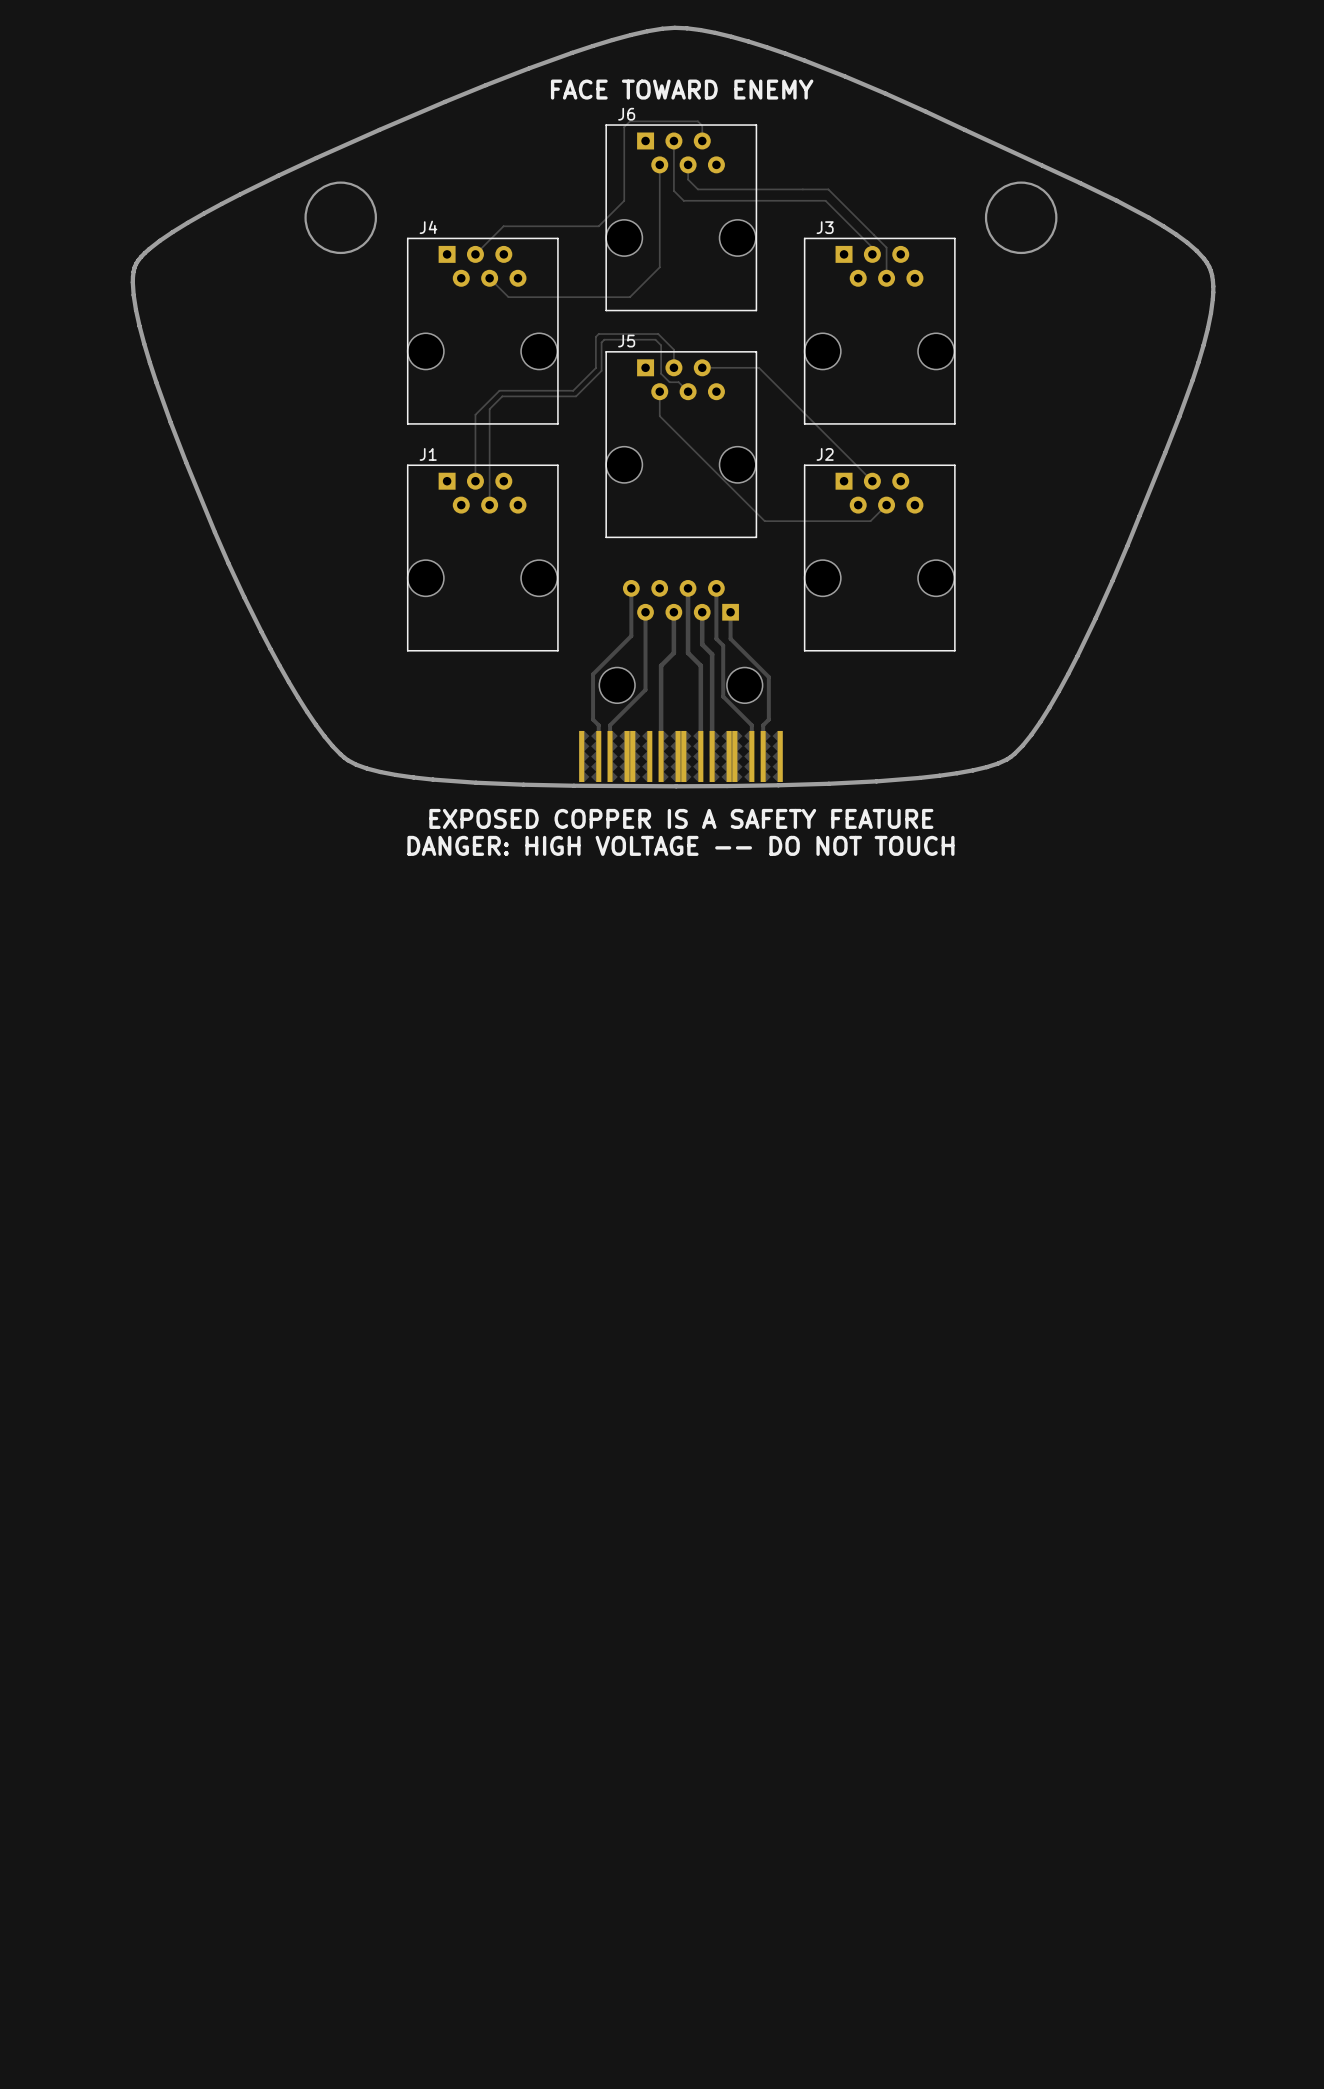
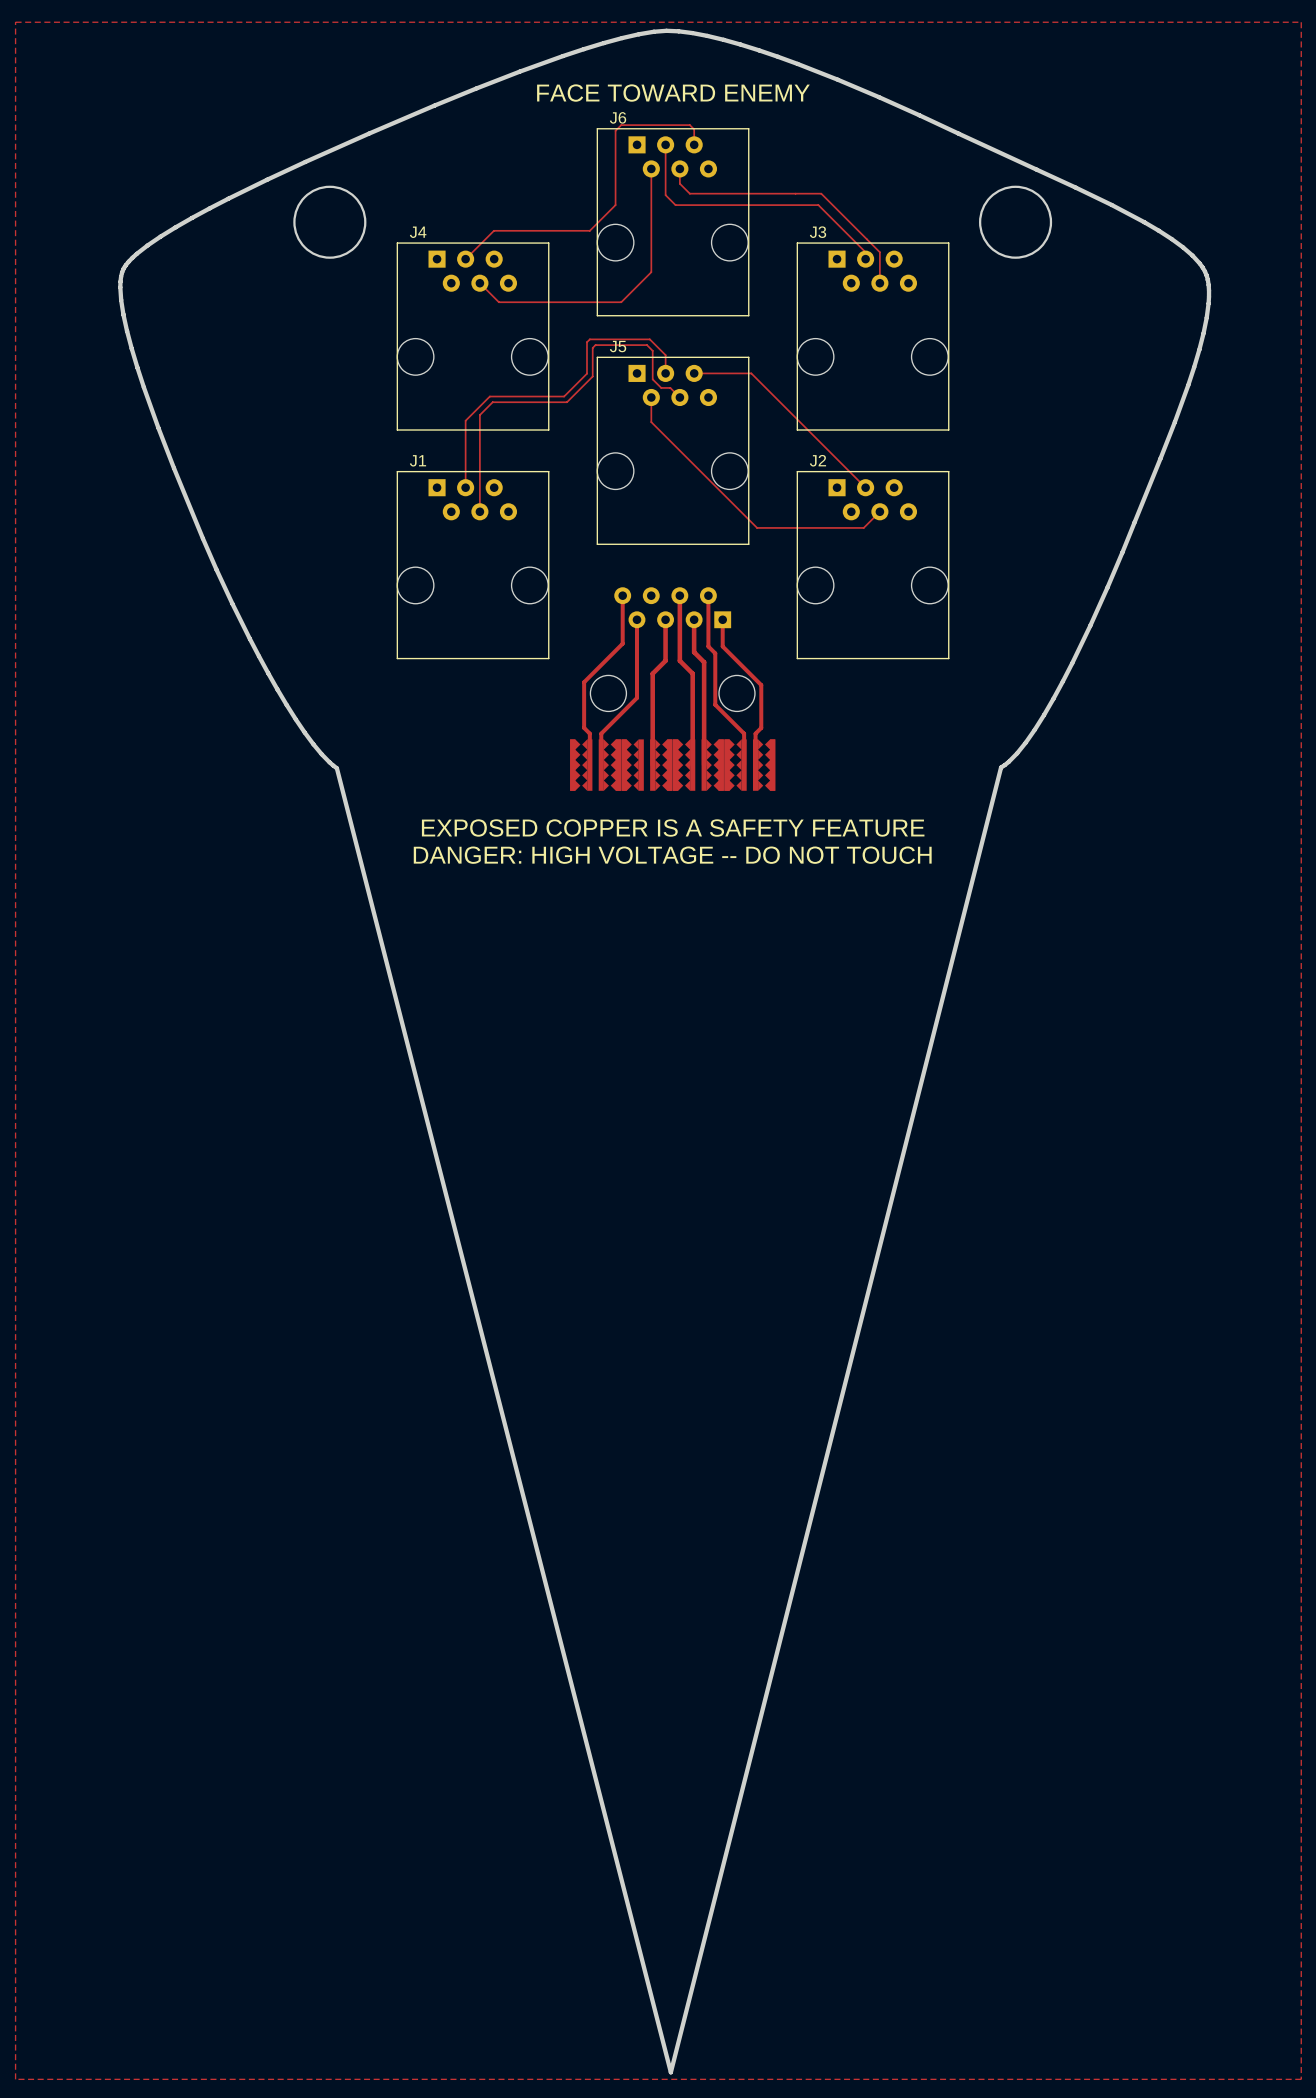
zone outline: none -> (15, 22) (15, 2079) (1301, 2079) (1301, 22) (15, 22)
board edge: (1212, 280) (1212, 298) (1207, 328) (1179, 416) (1127, 546) (1095, 618) (1068, 674) (1040, 721) (1014, 753) (998, 763) (957, 773) (876, 781) (726, 786) (523, 784) (413, 777) (367, 768) (347, 760) (332, 746) (307, 711) (279, 665) (244, 597) (186, 462) (156, 382) (144, 343) -> (1208, 285) (1208, 303) (1203, 333) (1188, 385) (1107, 587) (1072, 663) (1044, 715) (1017, 753) (1001, 767) (670, 2072) (336, 768) (321, 754) (295, 719) (268, 673) (232, 603) (174, 468) (131, 348)

